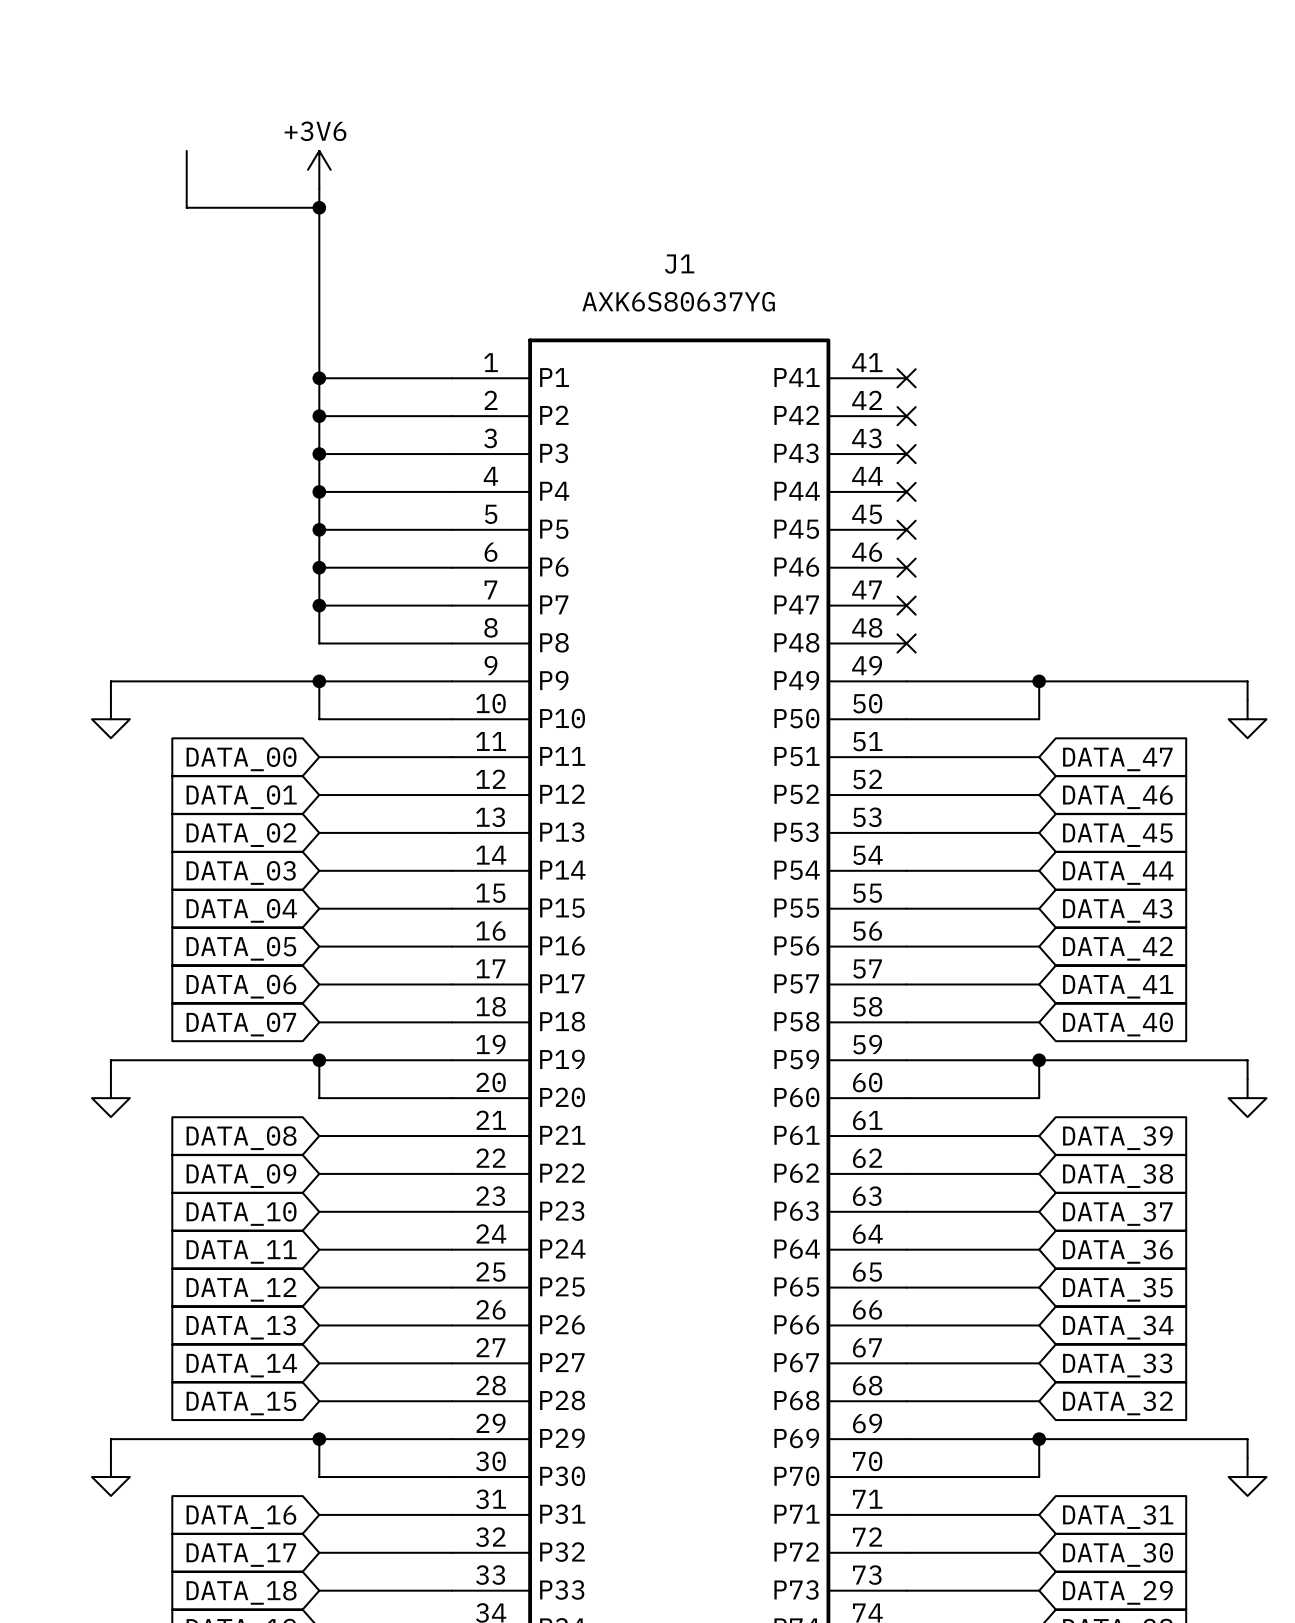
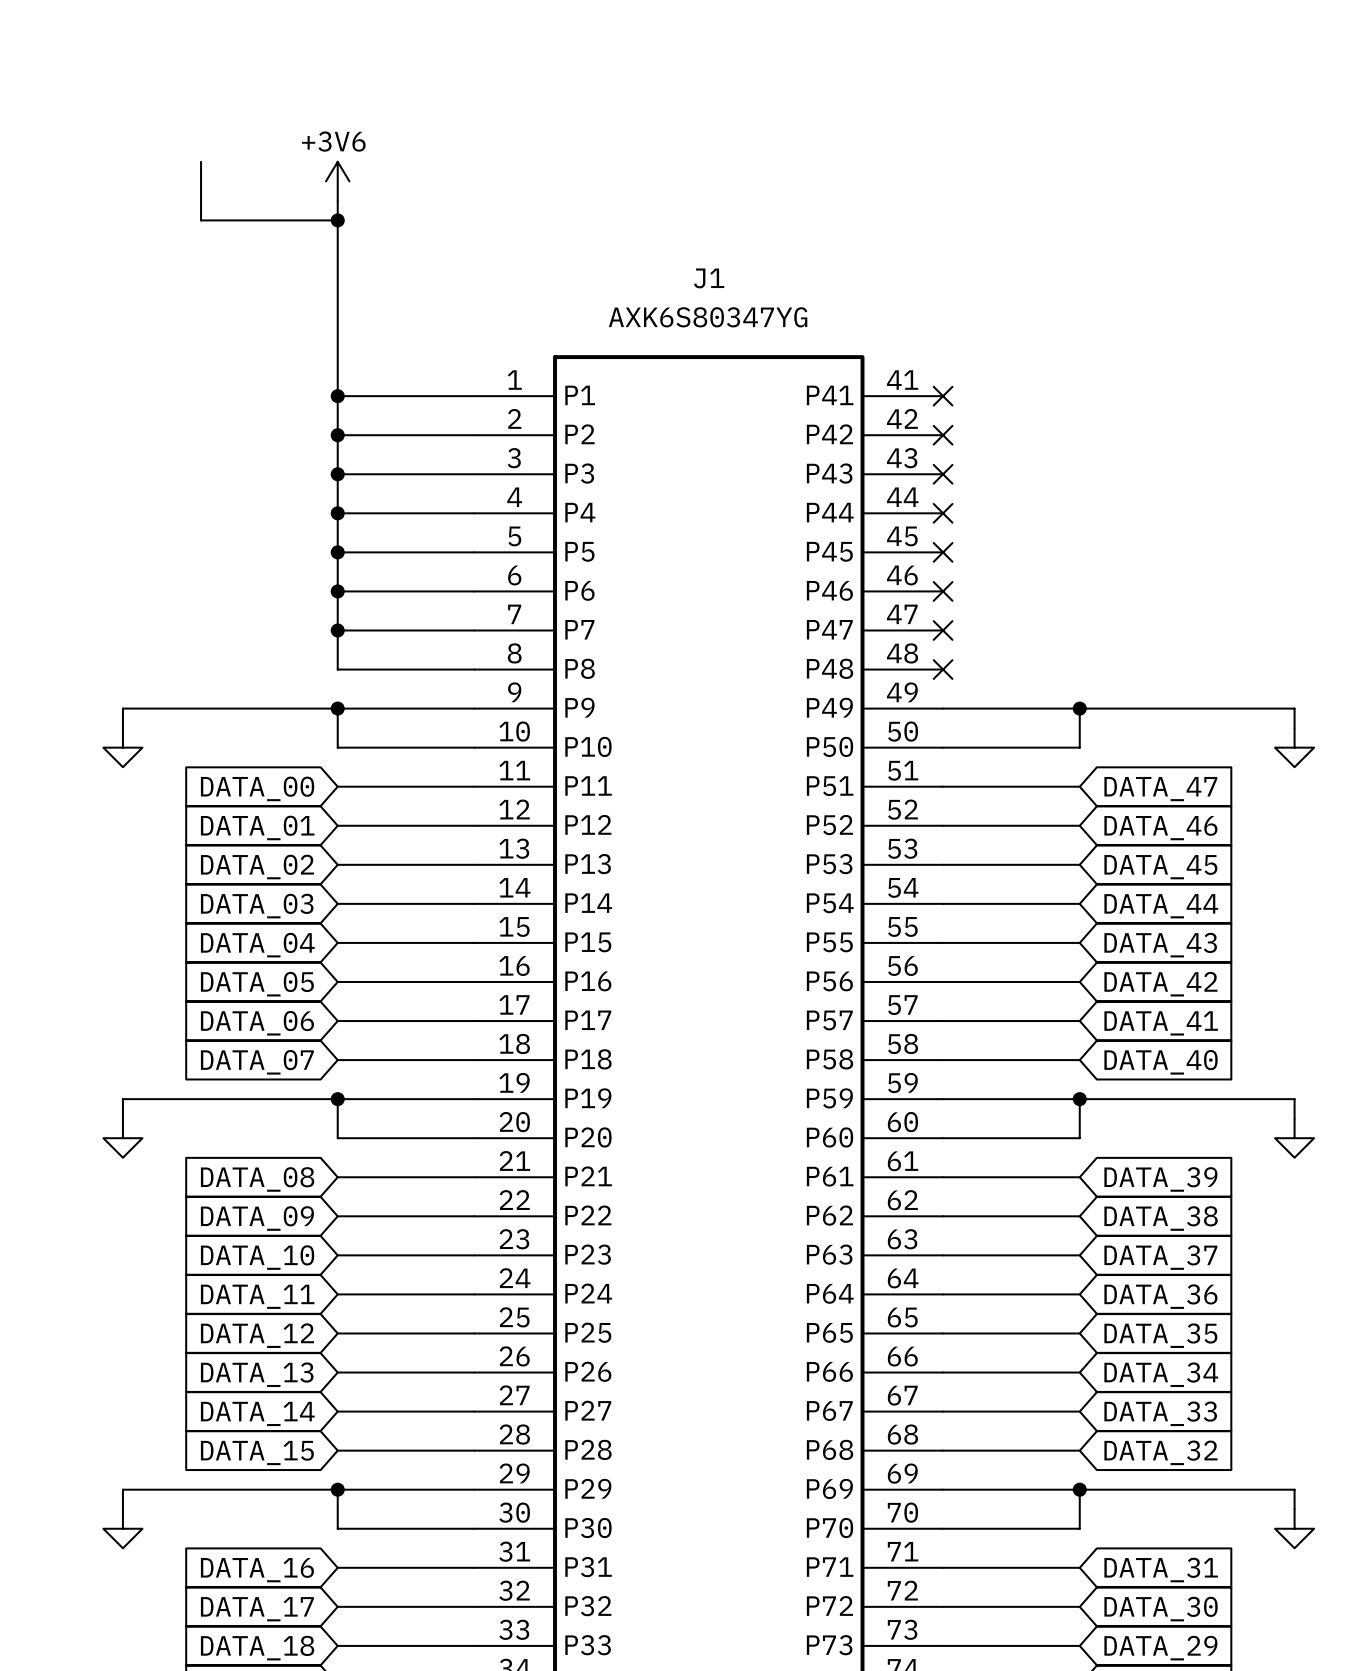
J1 value: AXK6S80637YG (678, 301) -> AXK6S80347YG (708, 317)

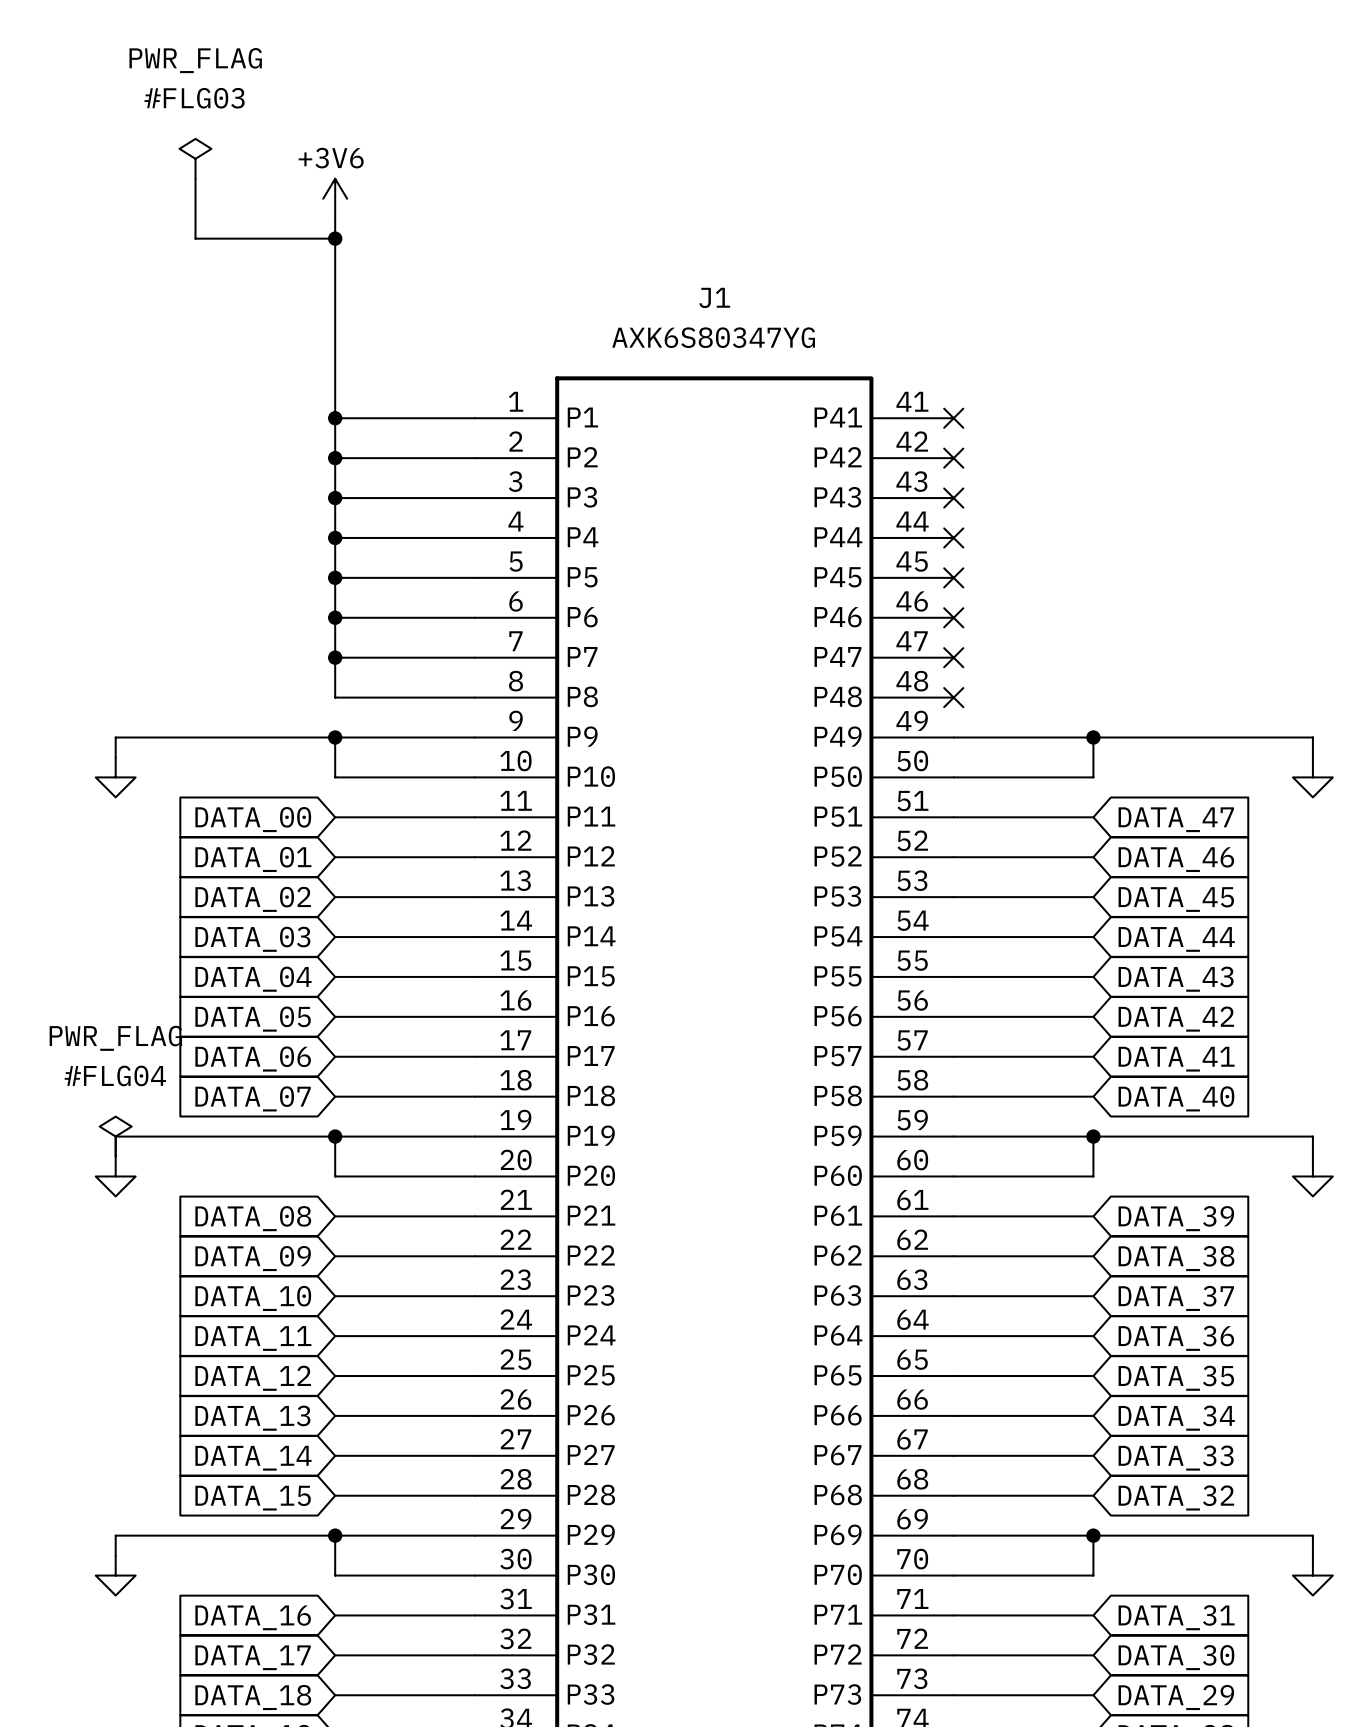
#FLG03: none -> PWR_FLAG (195, 158)
#FLG04: none -> PWR_FLAG (115, 1136)

